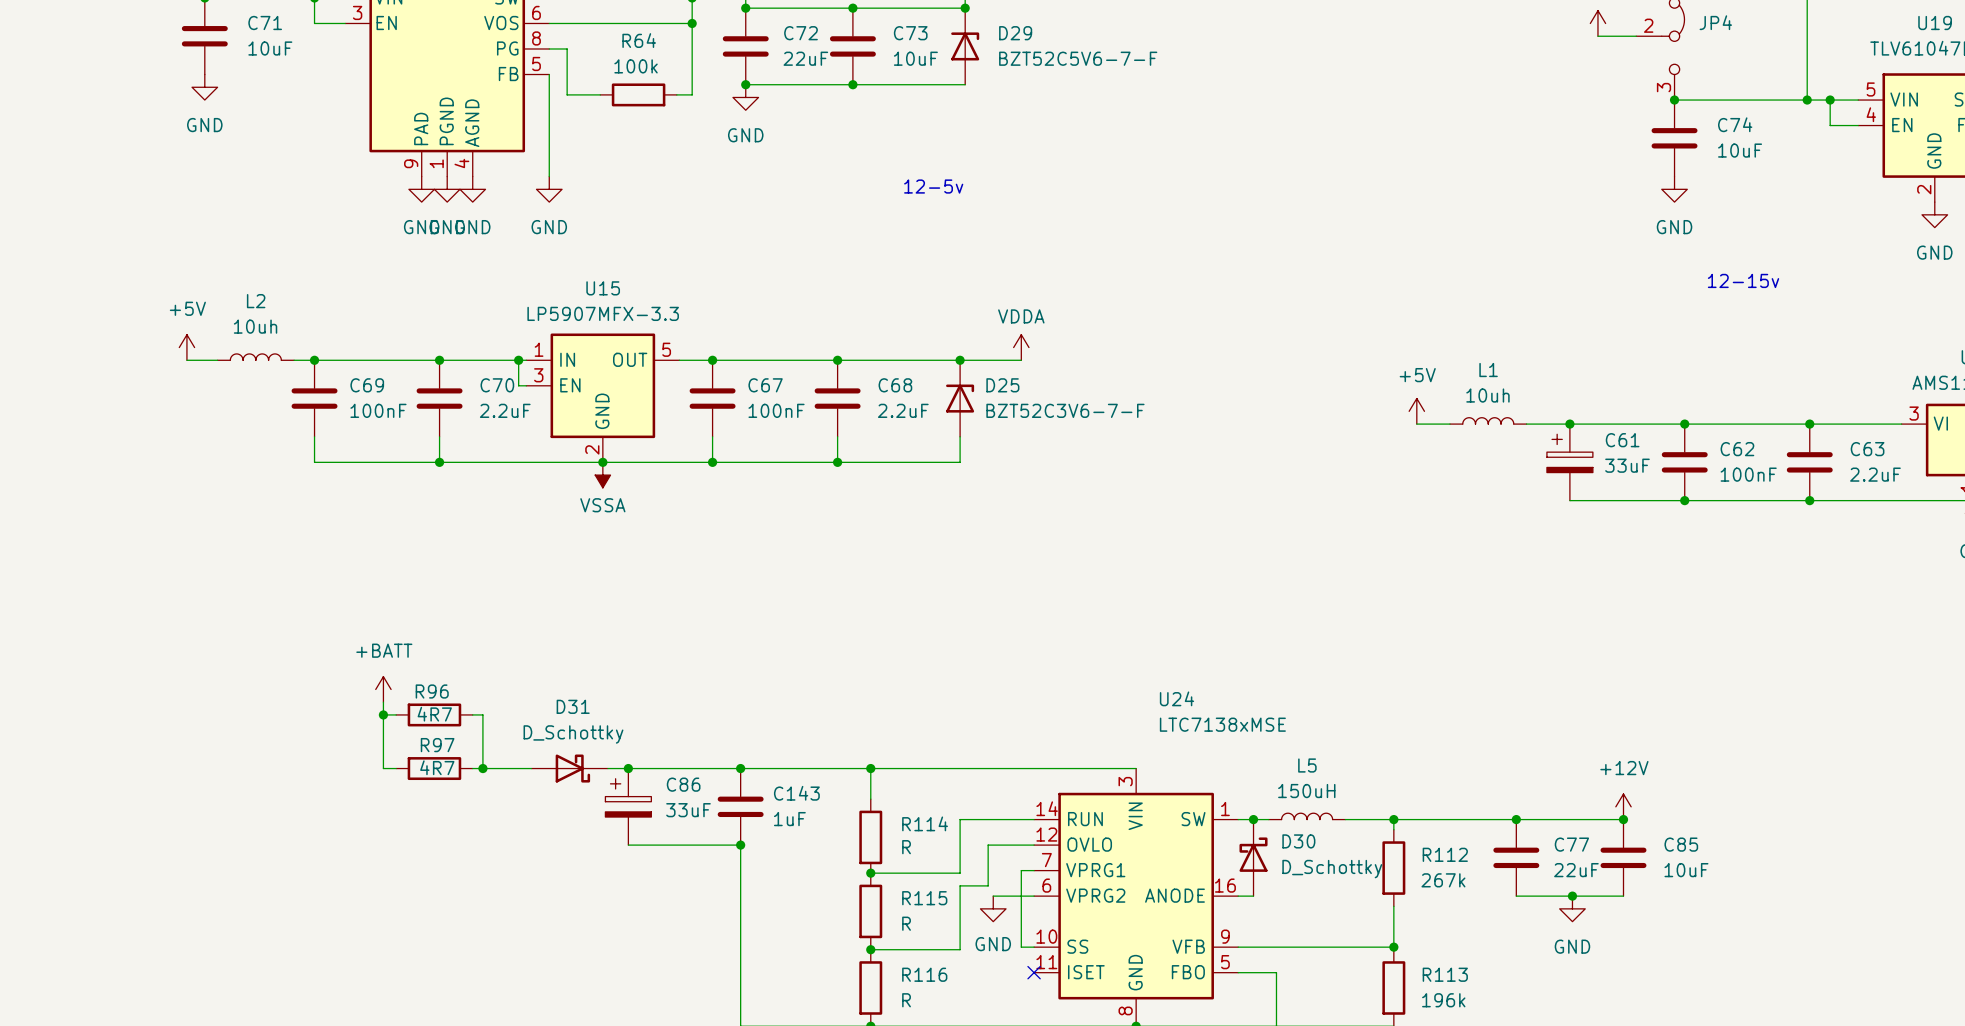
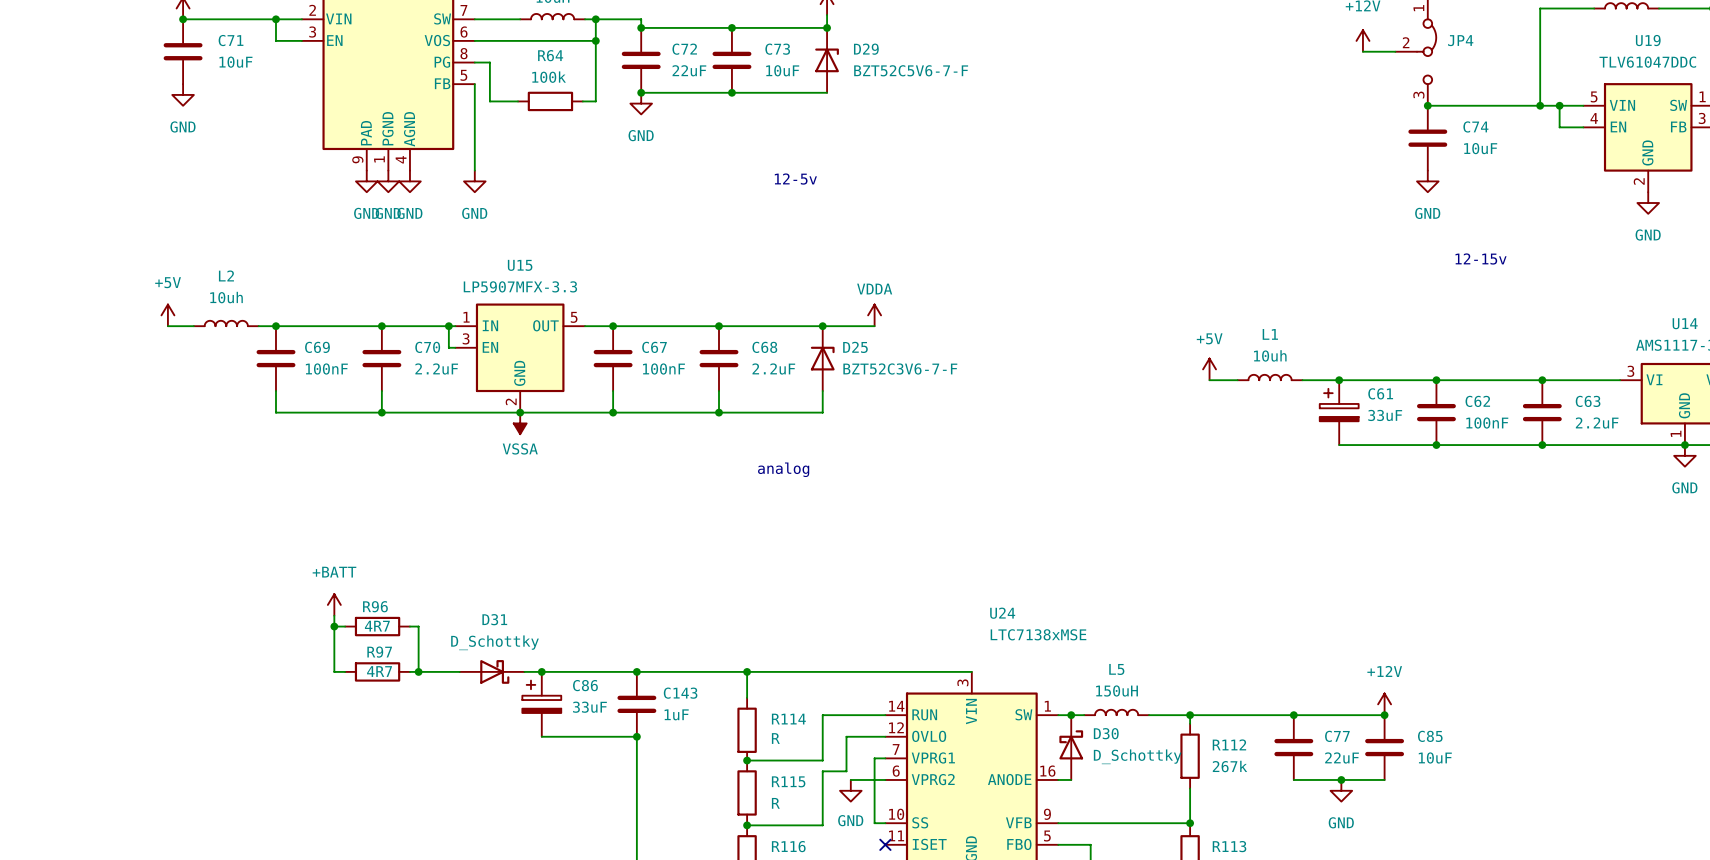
text: none -> analog (783, 469)

